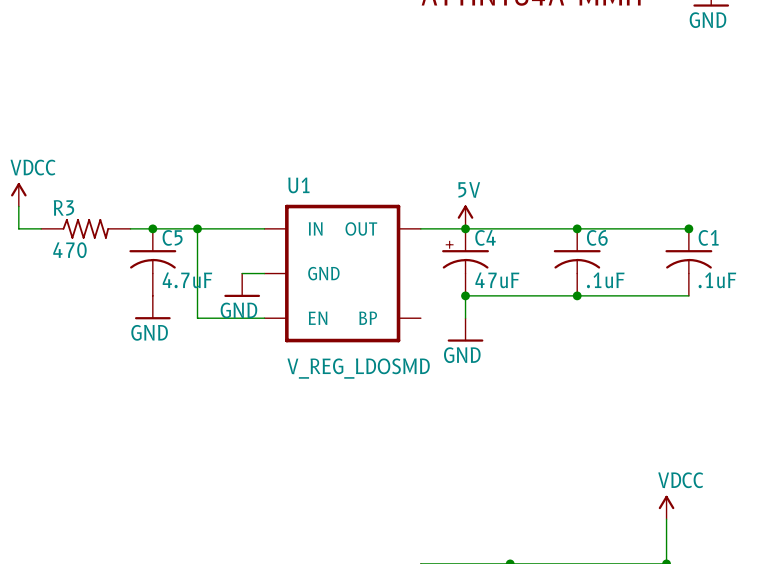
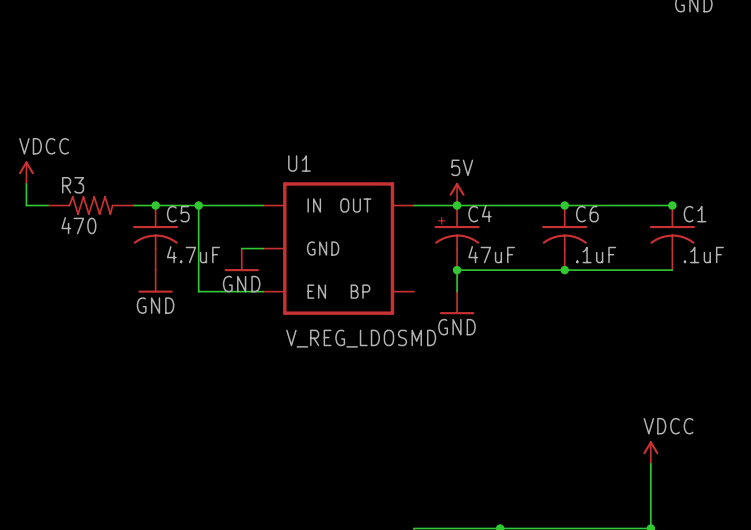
power symbol position: VDCC (666, 507) -> VDCC (650, 452)

